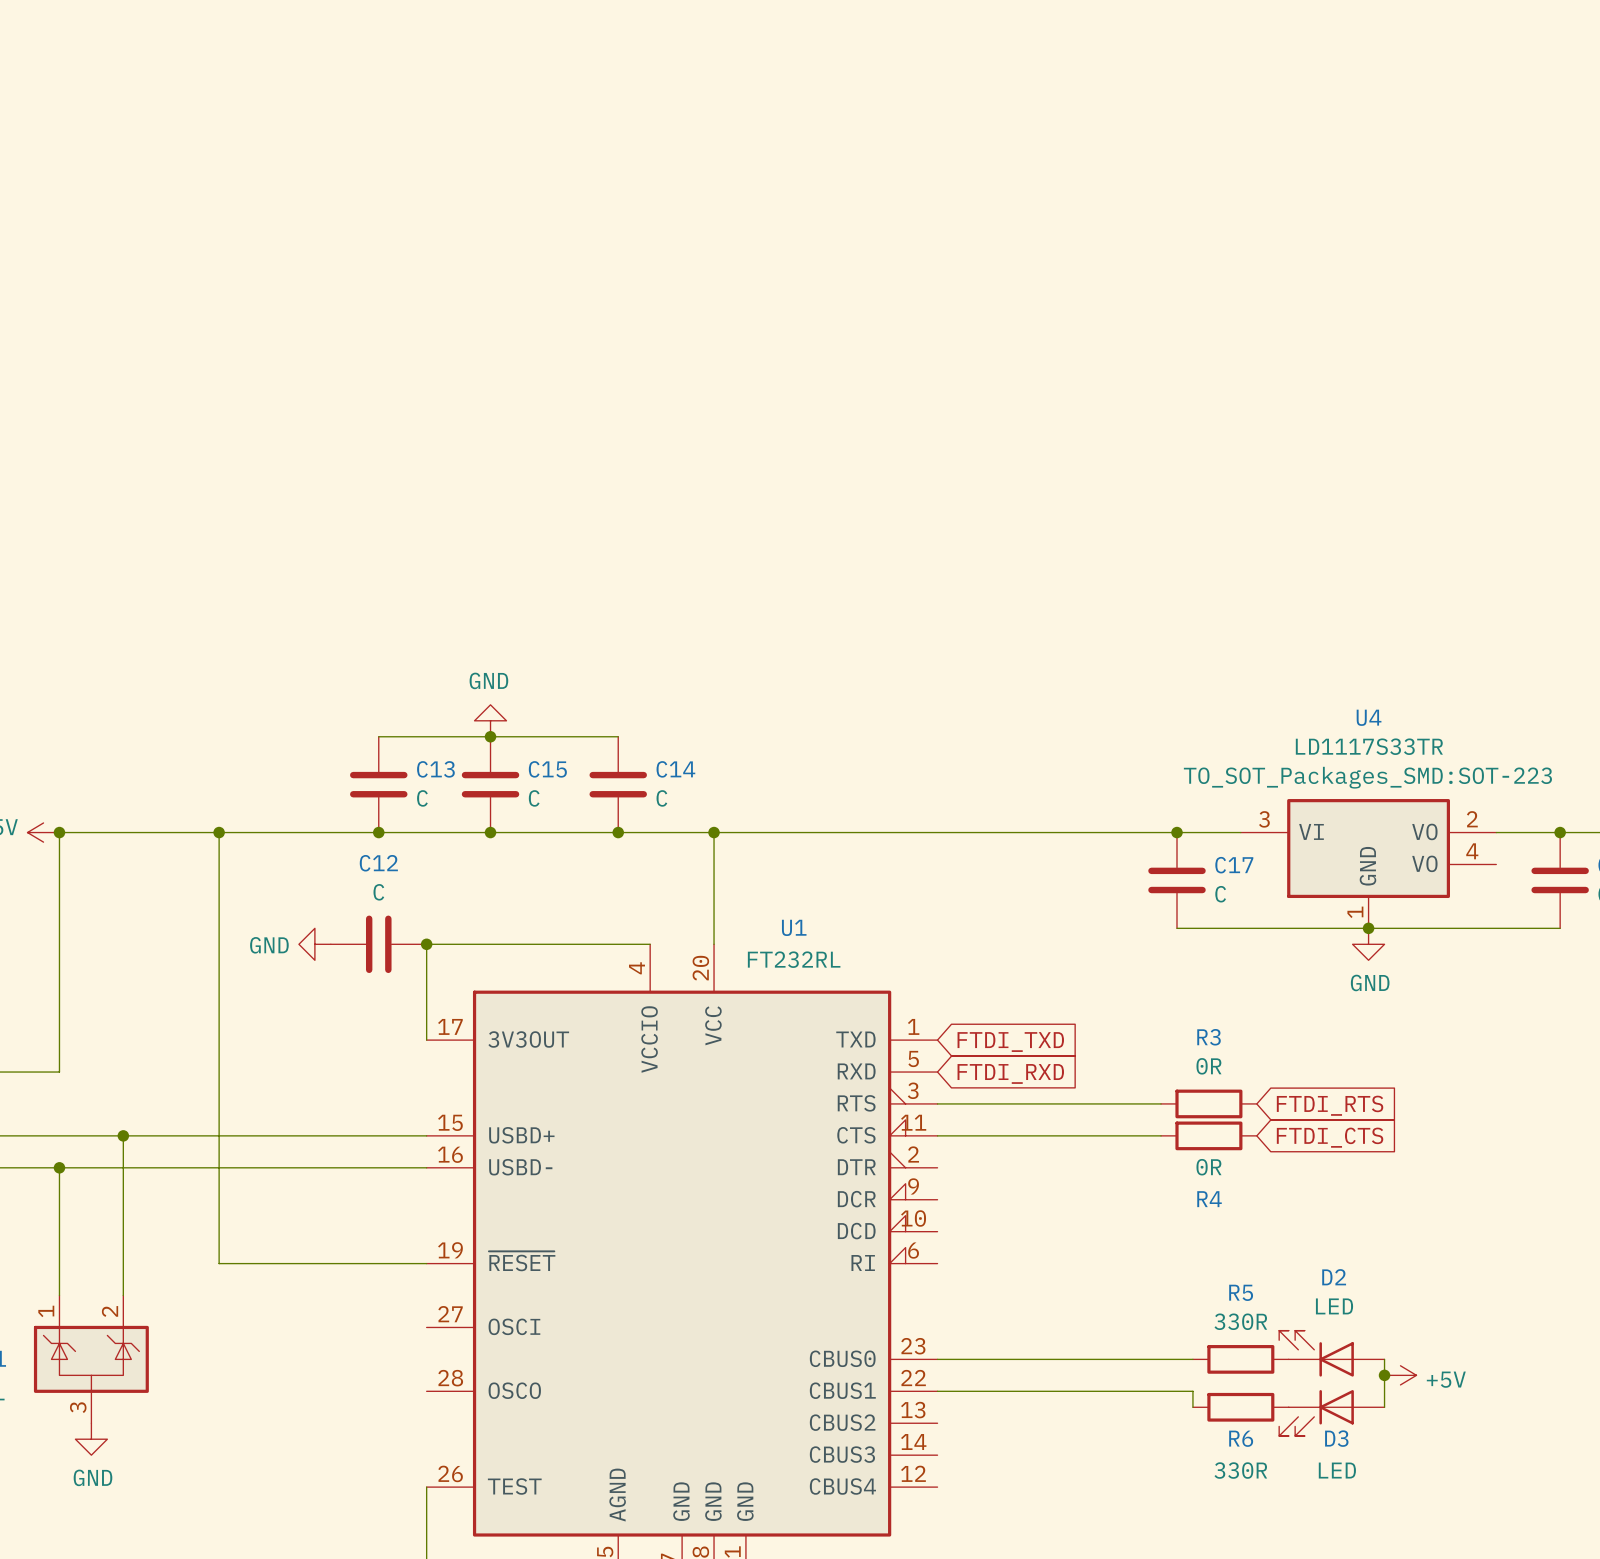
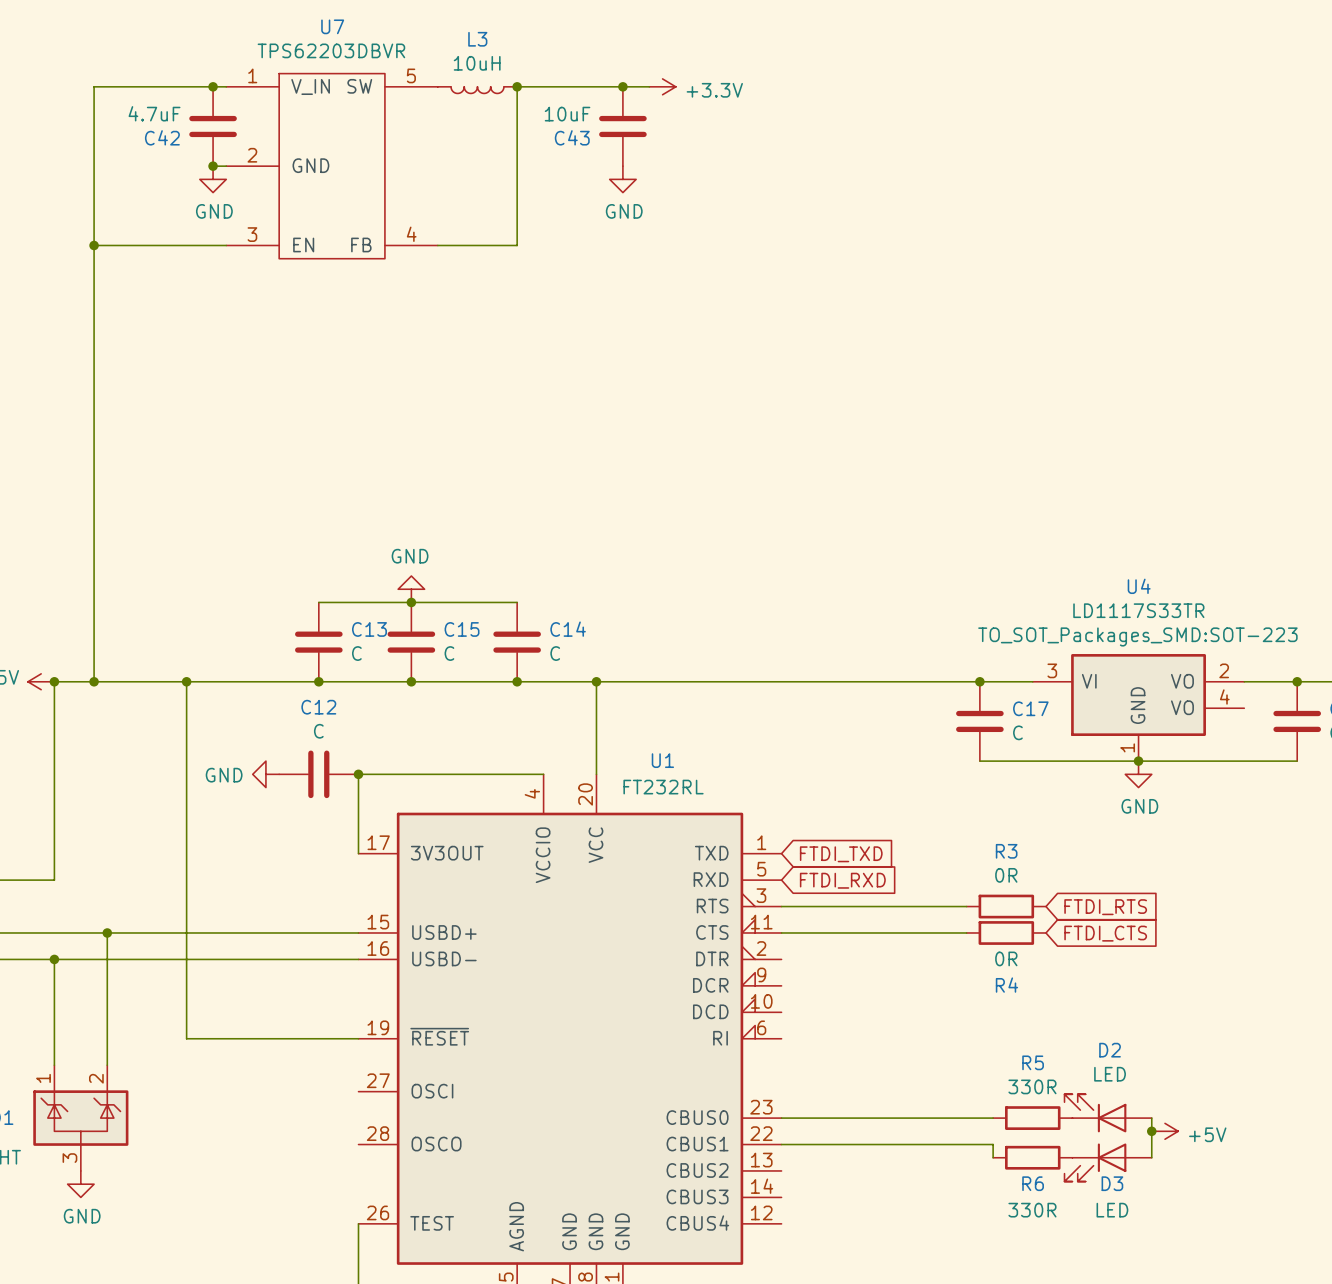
junction: none -> (213, 86)
wire: none -> (226, 86) (94, 86) (94, 681)
junction: none -> (517, 86)
junction: none -> (622, 86)
wire: none -> (649, 86) (517, 86) (517, 245) (437, 245)
power symbol: none -> +3.3V (662, 86)
L3: none -> 10uH (477, 90)
C42: none -> 4.7uF (213, 126)
C43: none -> 10uF (622, 126)
wire: none -> (213, 166) (226, 166)
junction: none -> (213, 166)
U7: none -> TPS62203DBVR (332, 166)
power symbol: none -> GND (213, 179)
power symbol: none -> GND (622, 179)
wire: none -> (94, 245) (226, 245)
junction: none -> (94, 245)
junction: none -> (94, 681)

